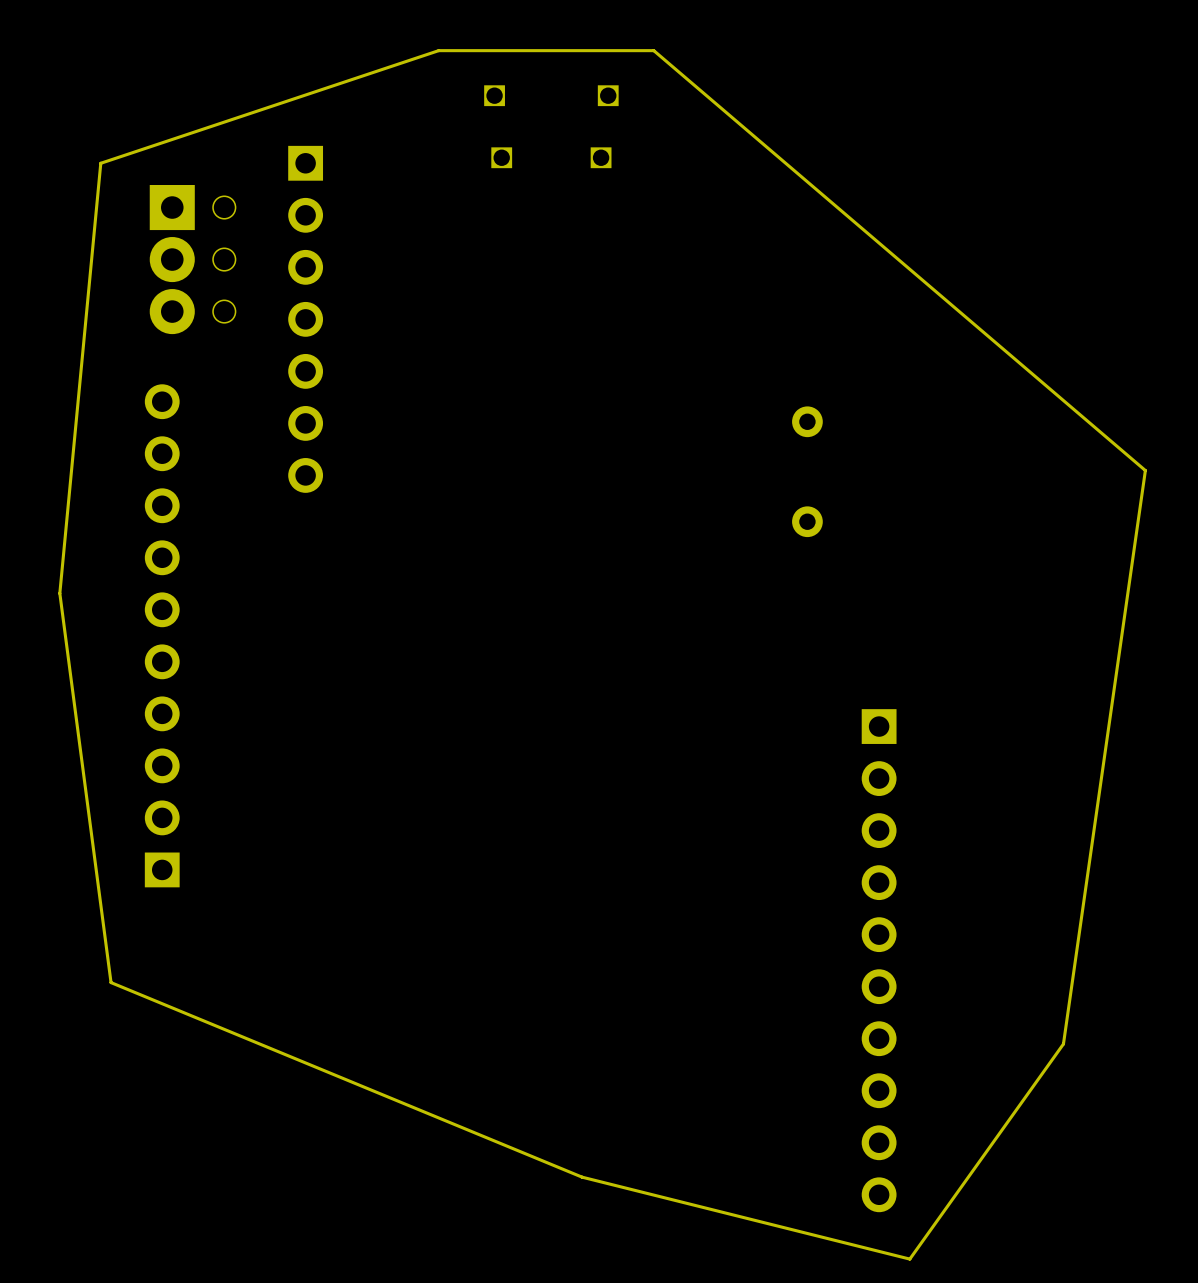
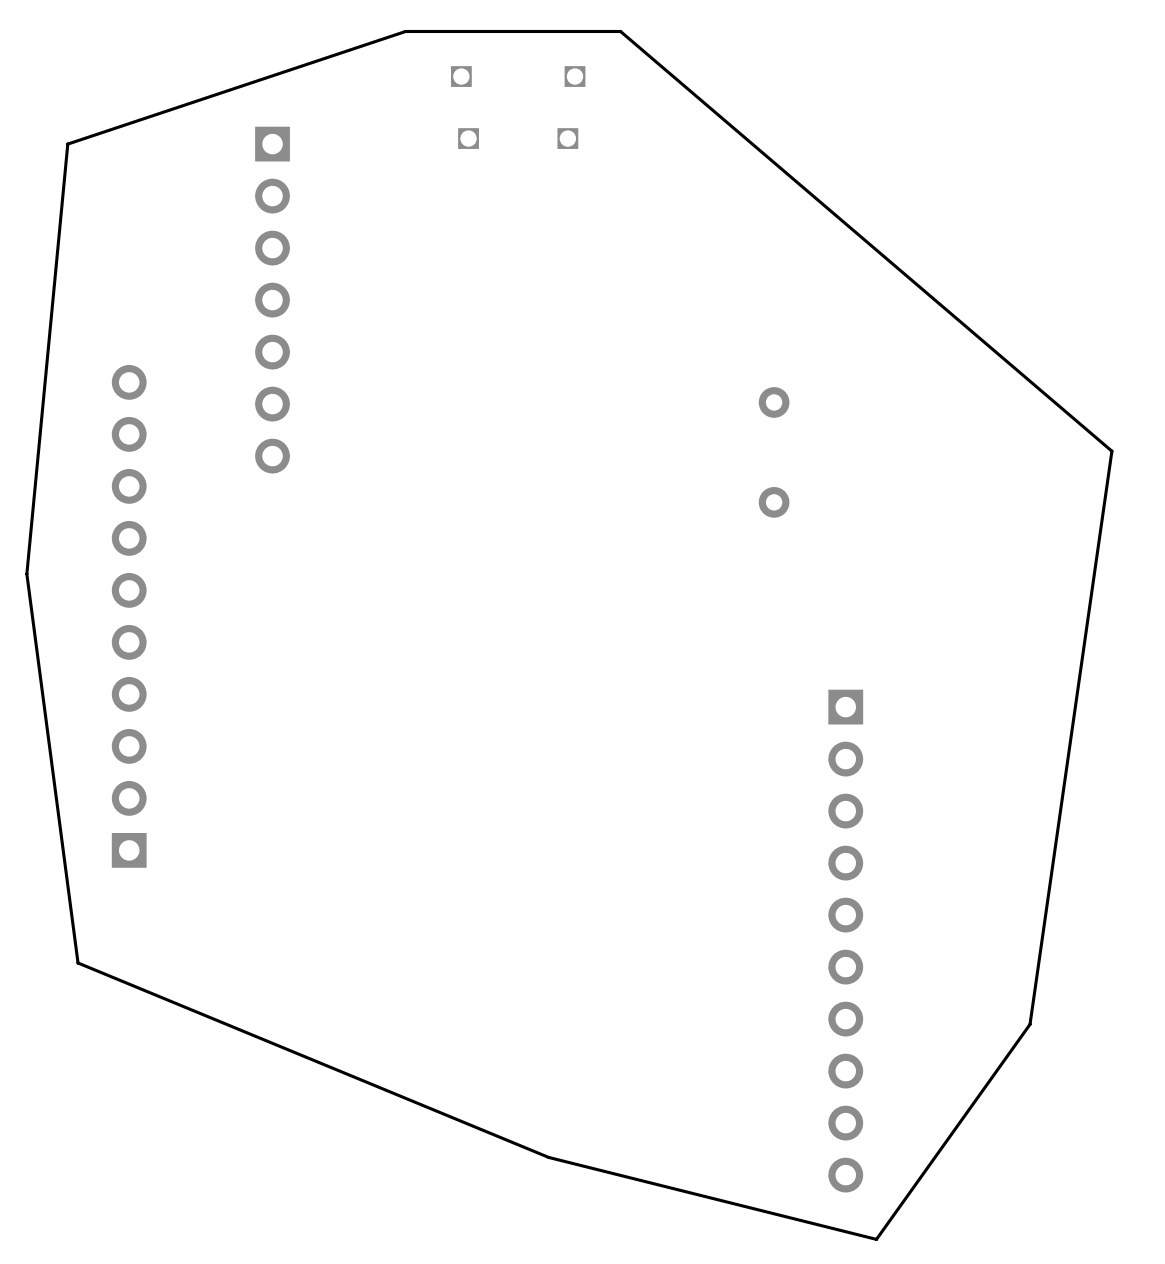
part: (192, 259) -> none

